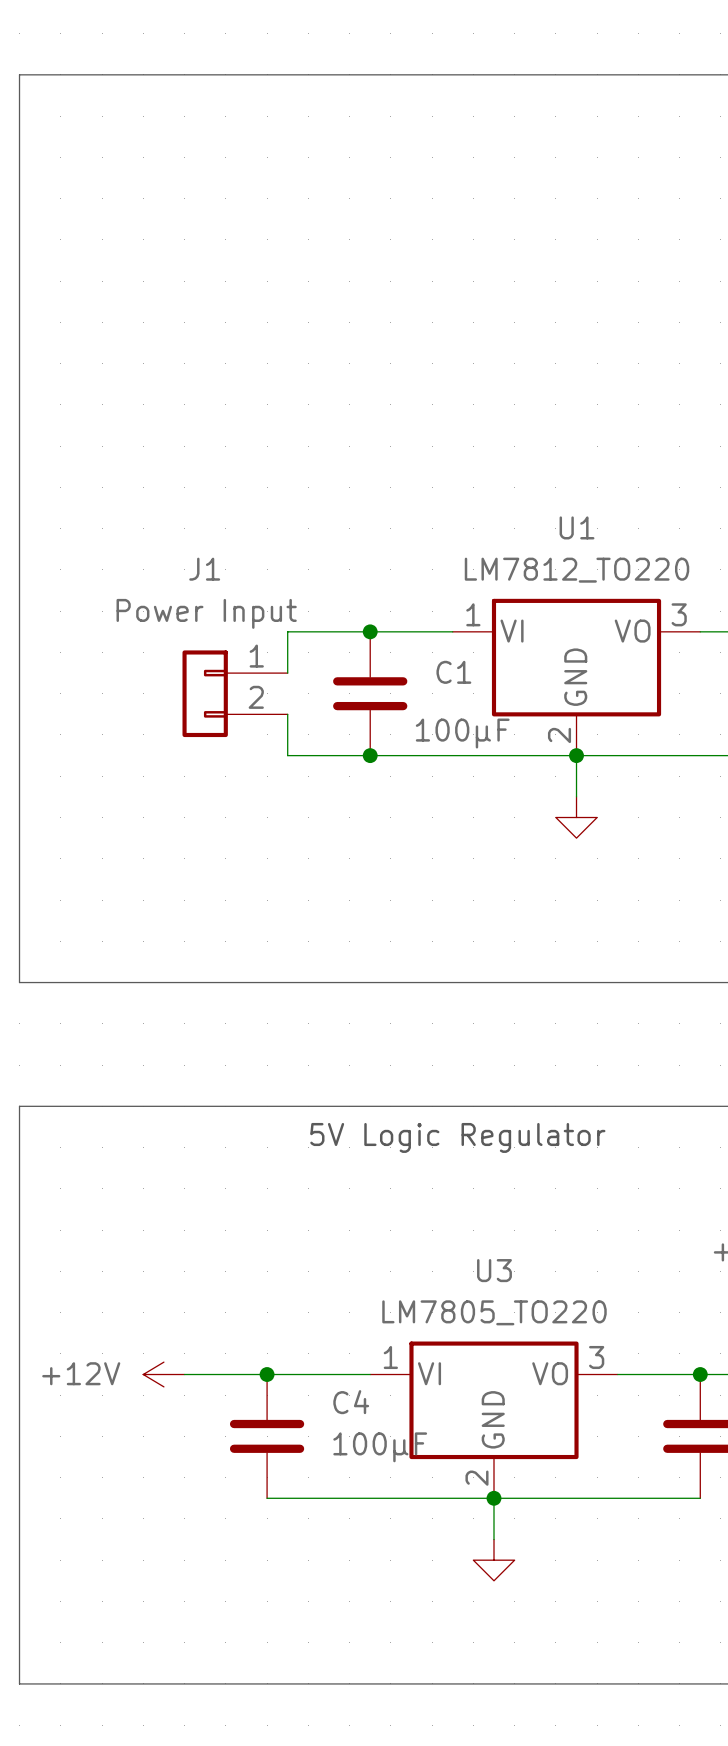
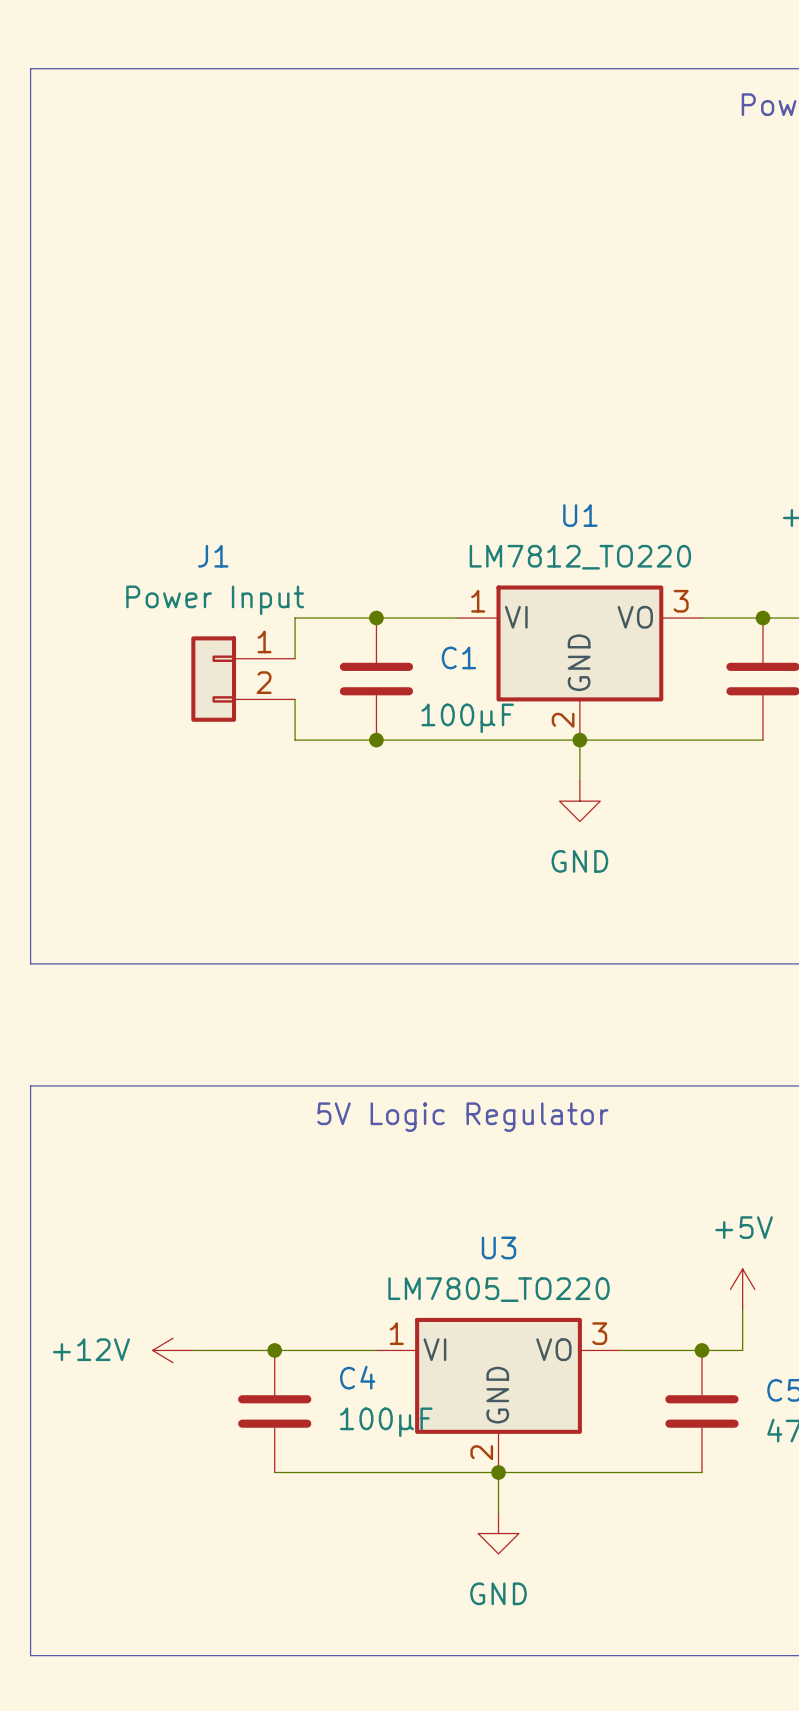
power symbol text: none -> GND (579, 861)
power symbol text: none -> GND (498, 1593)

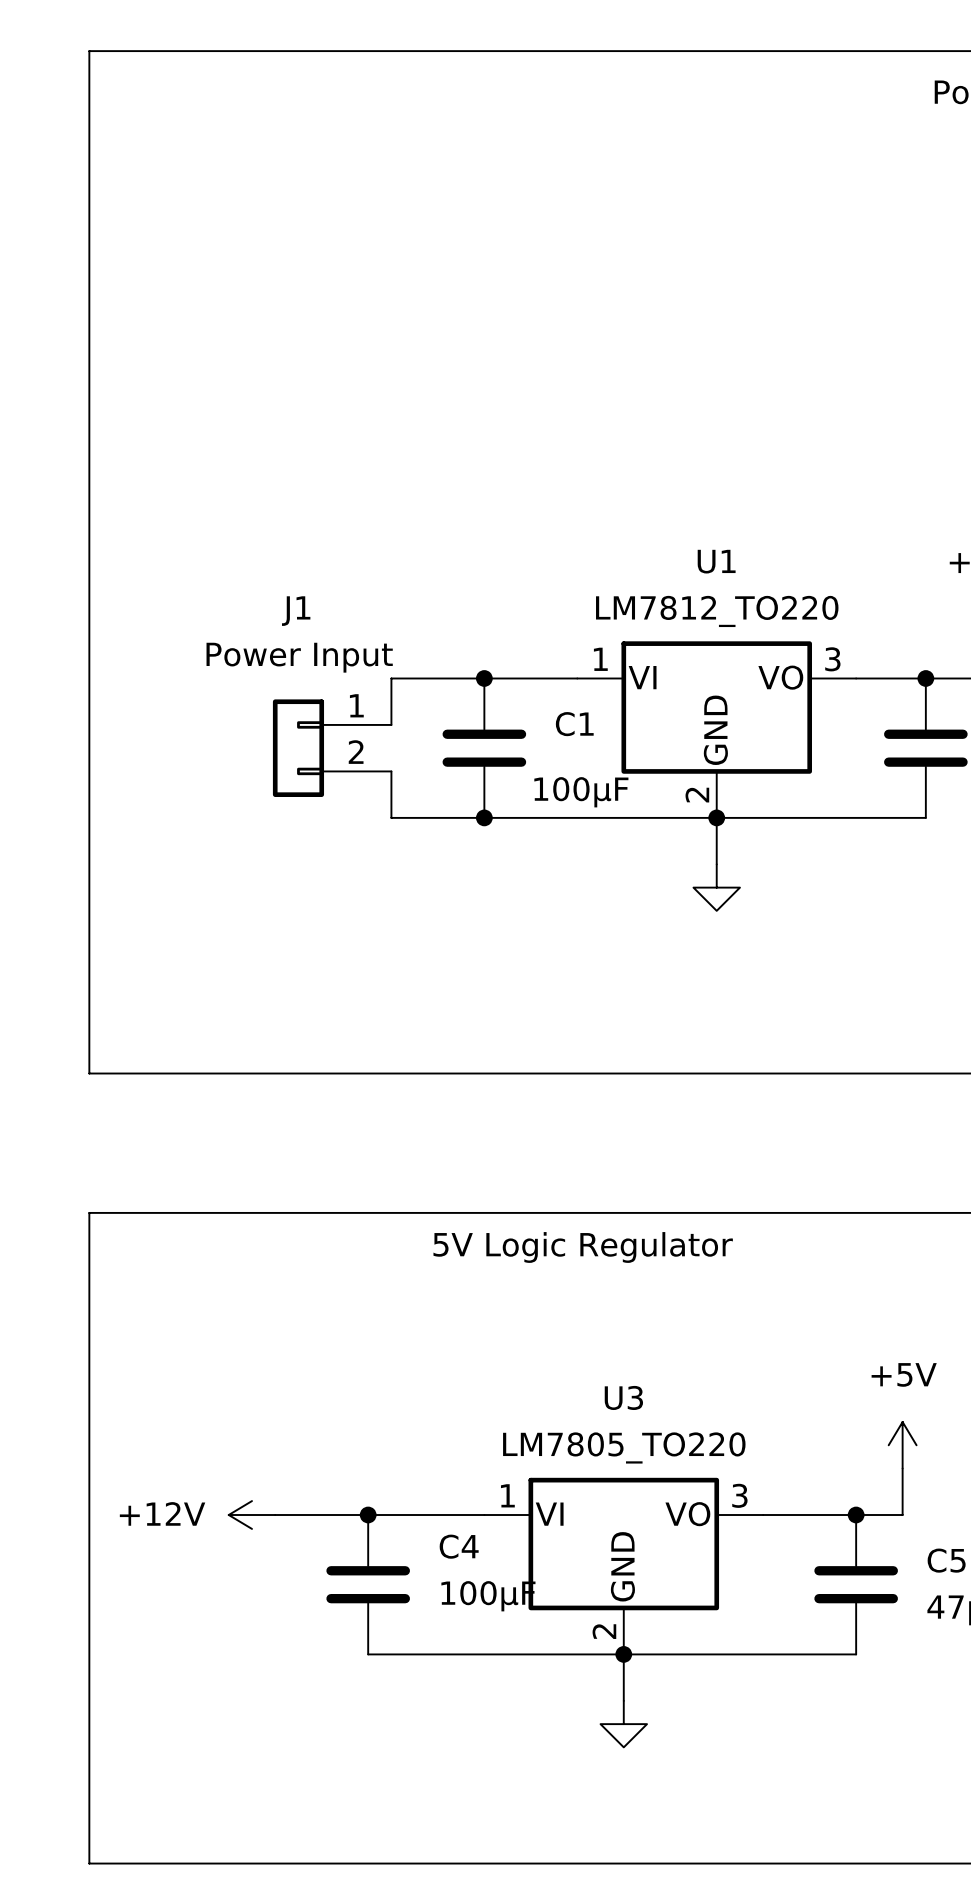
power symbol text: GND (579, 861) -> none
power symbol text: GND (498, 1593) -> none

